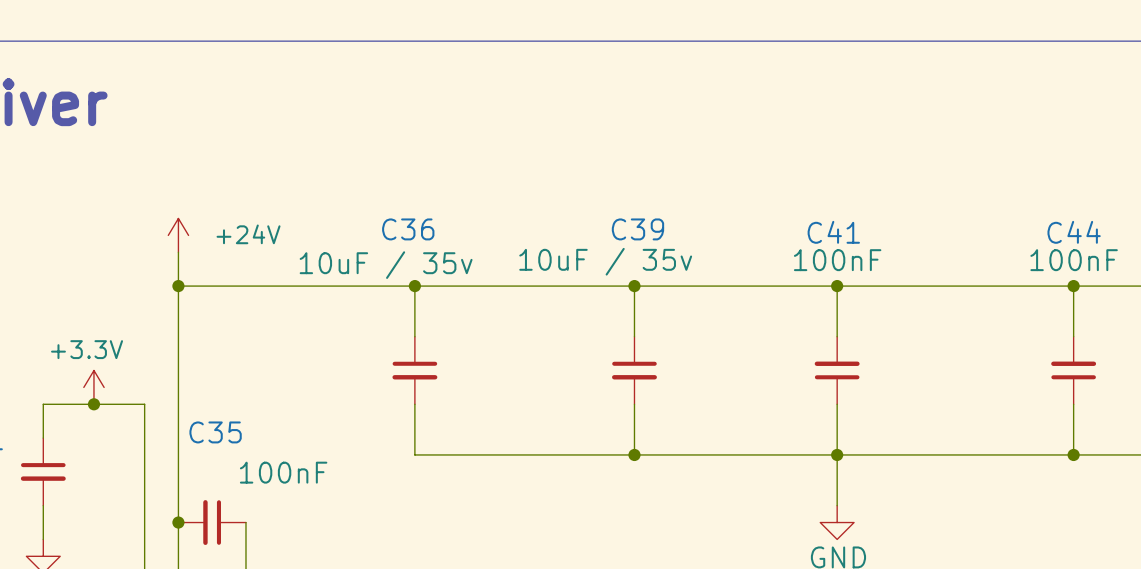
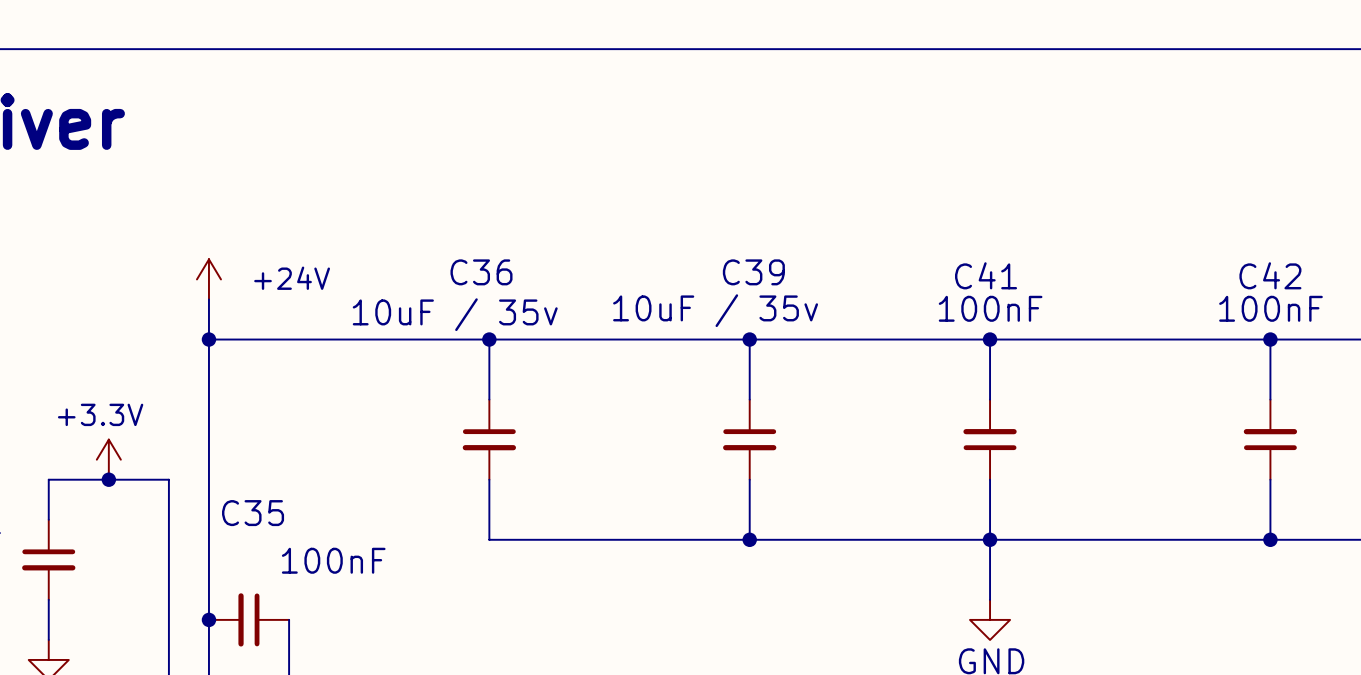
C44 name: C44 (1074, 232) -> C42 (1270, 275)

